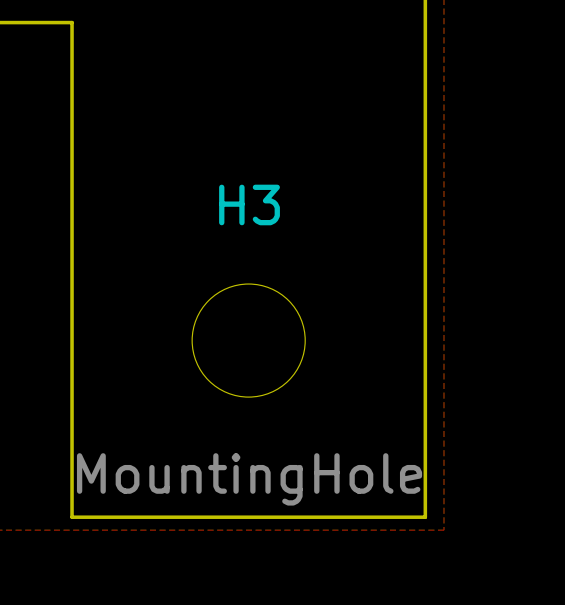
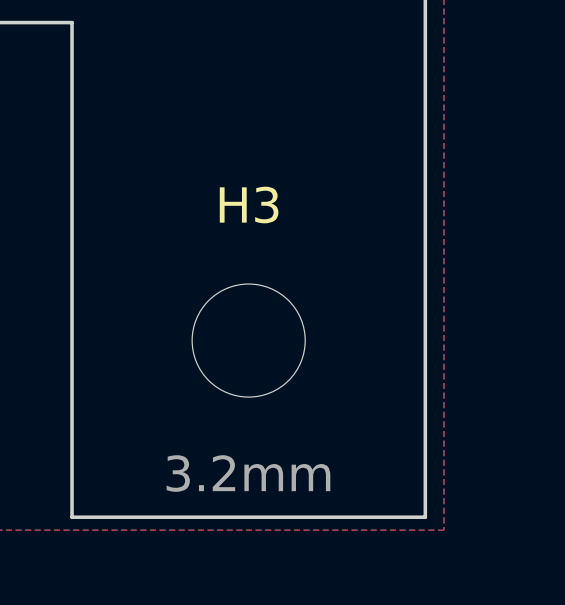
H3 value: MountingHole (249, 479) -> 3.2mm (248, 473)

